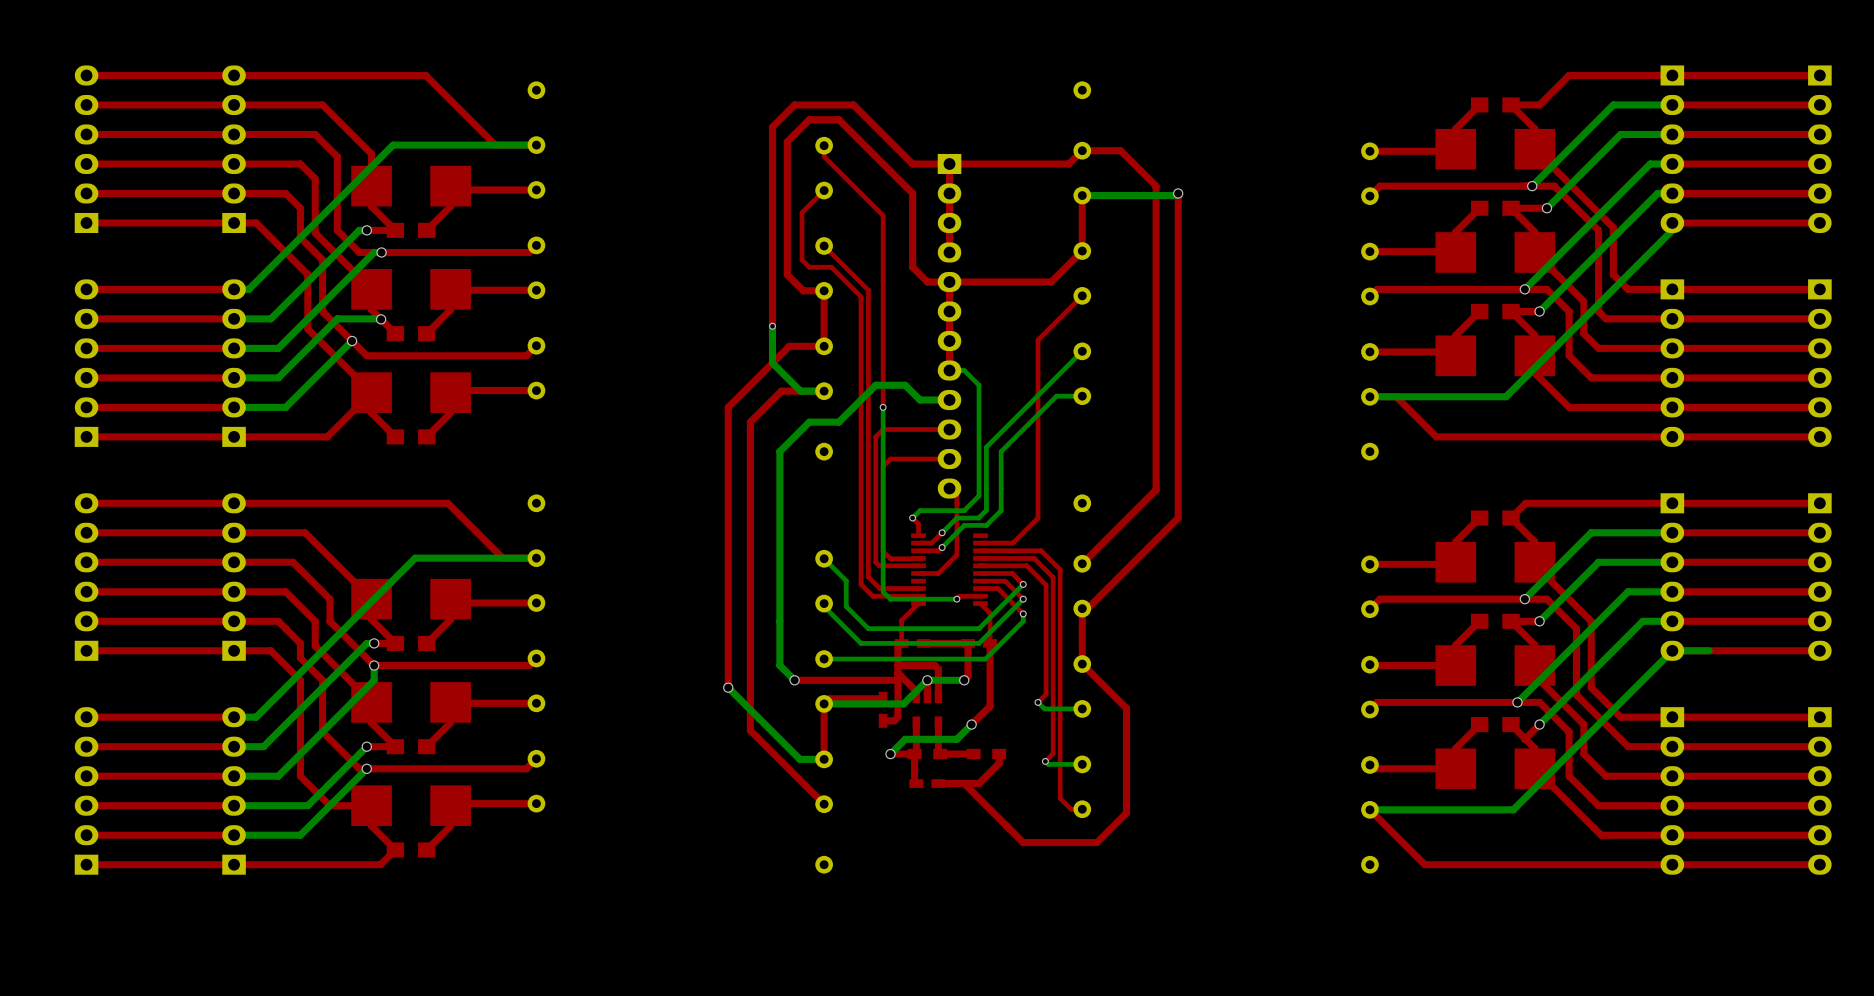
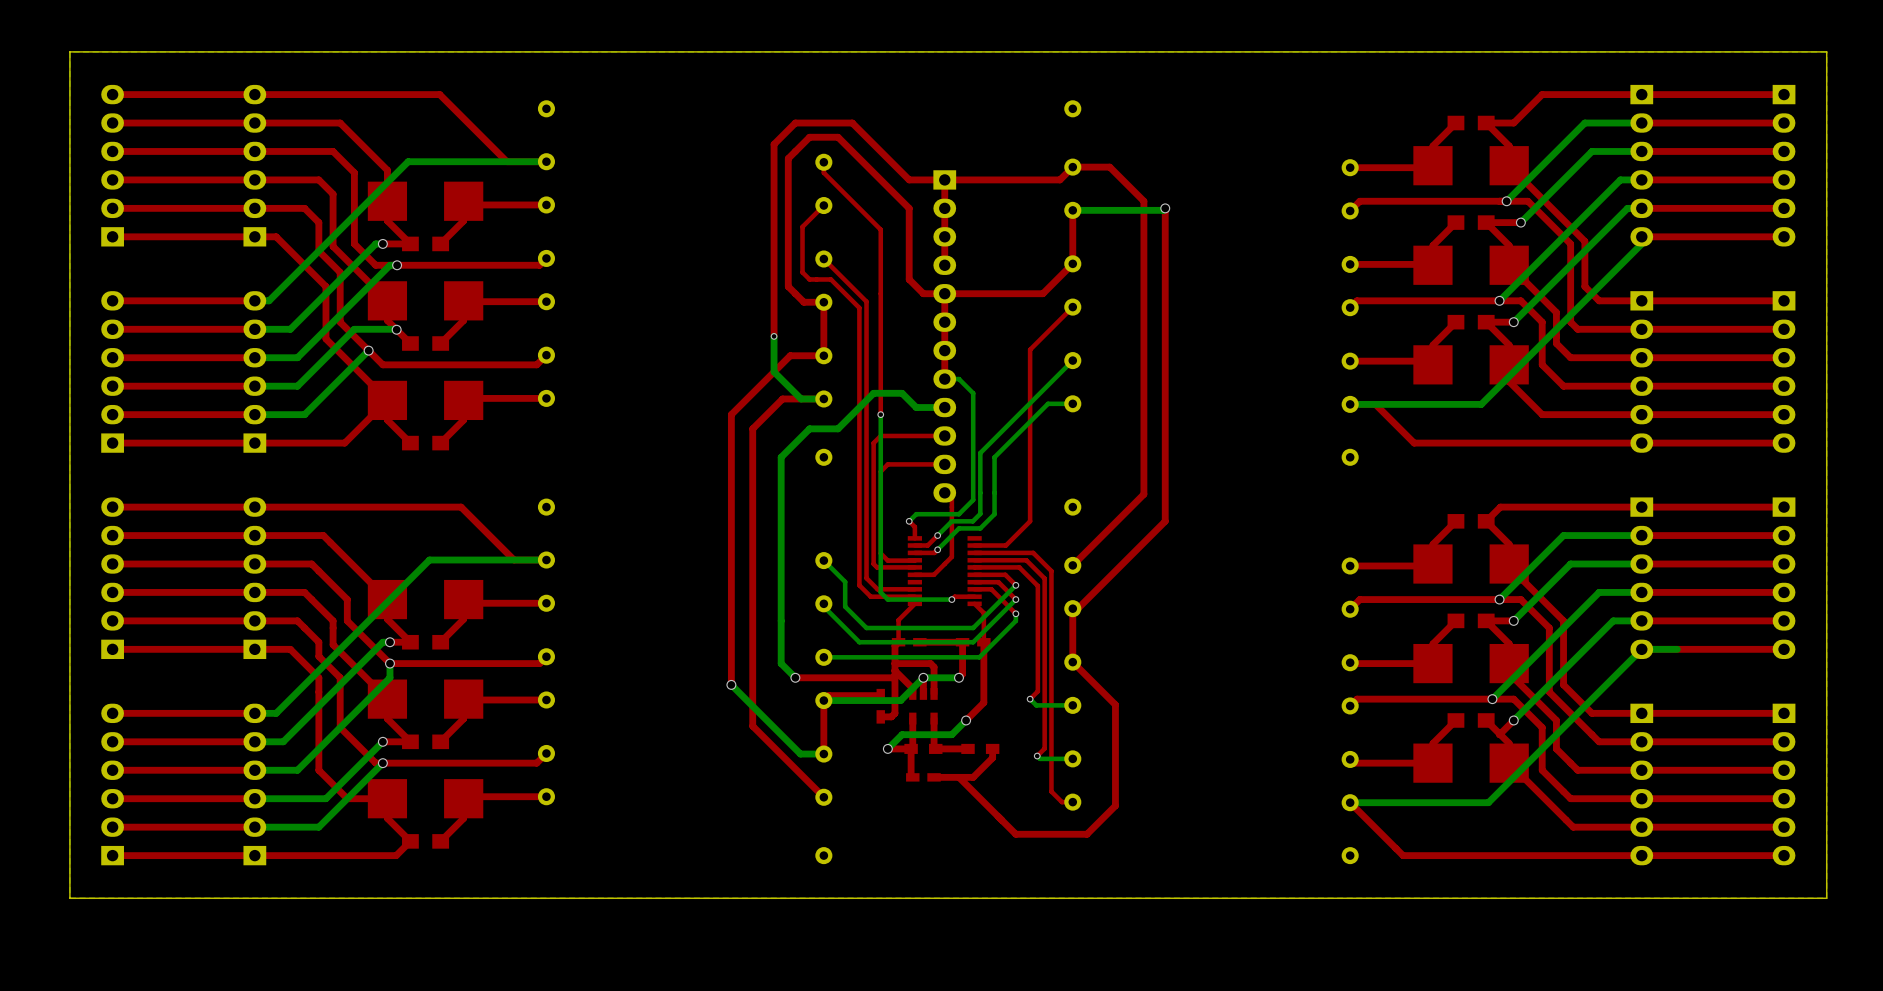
board edge: none -> (1826, 51) (1826, 898) (69, 898) (69, 51) (1826, 51)

